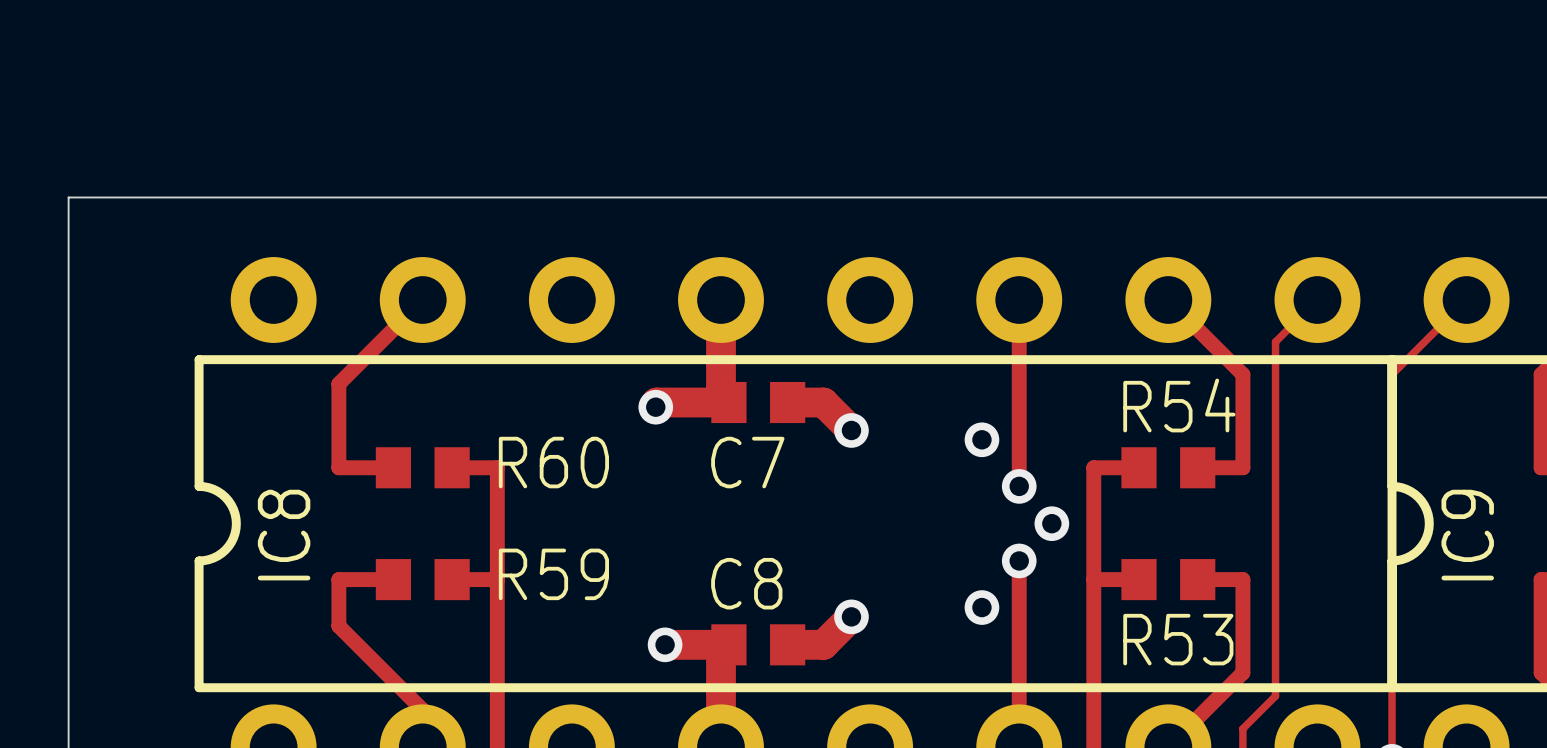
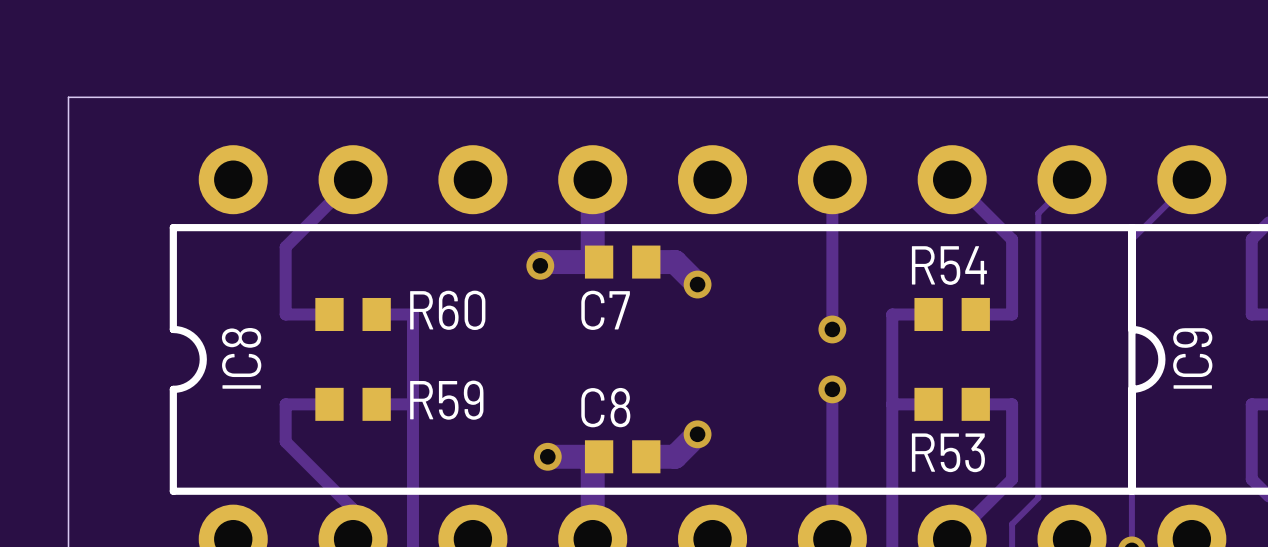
via: (981, 439) -> none
via: (1051, 523) -> none
via: (981, 607) -> none

